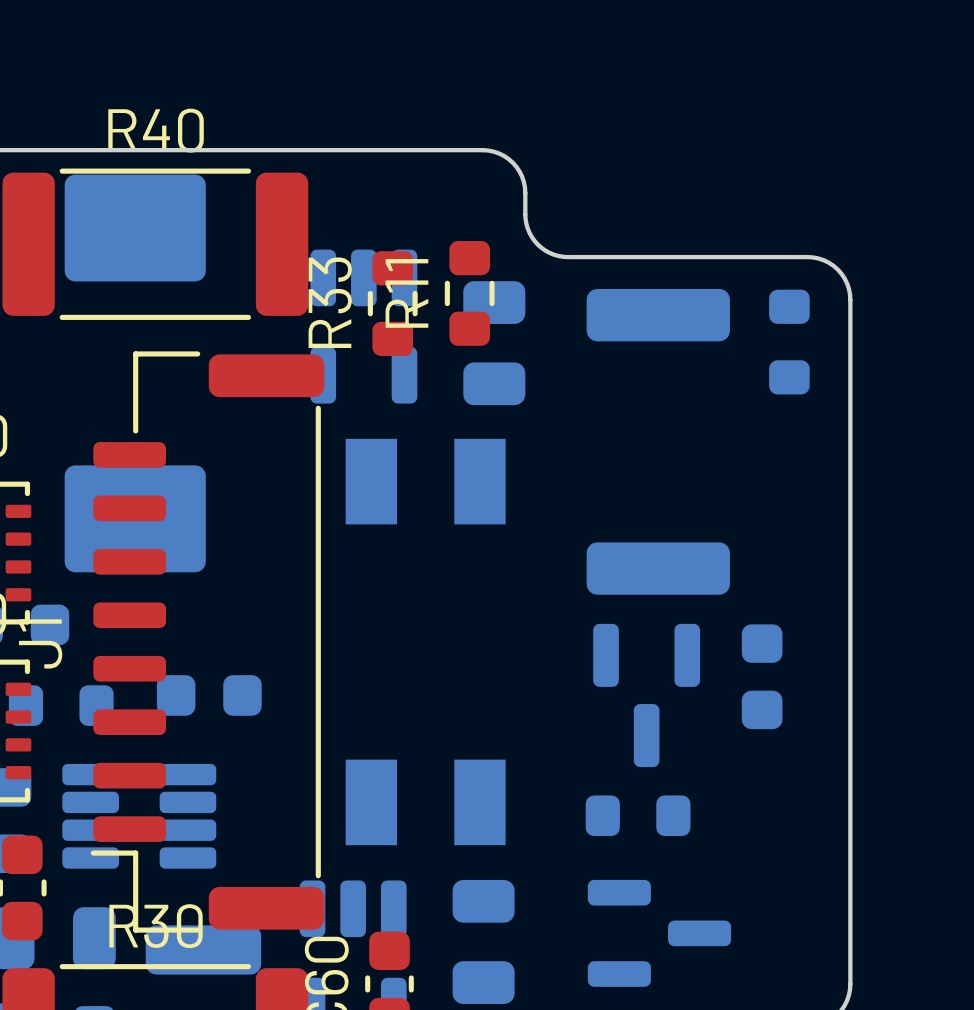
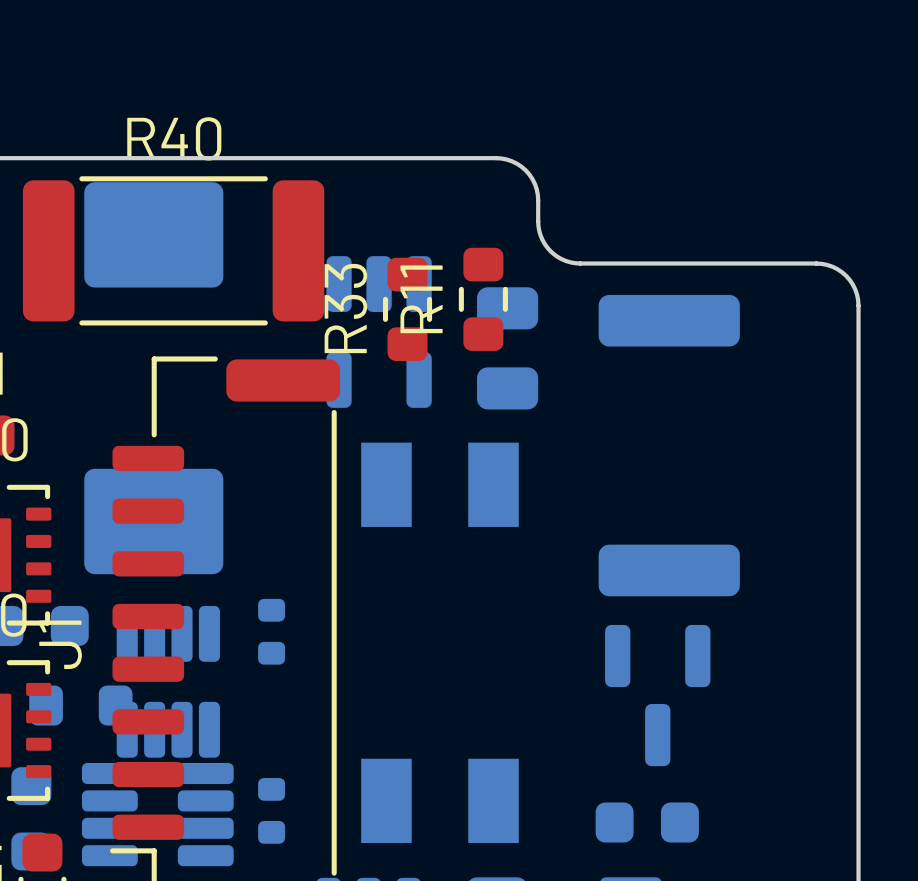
part: (789, 342) -> none
part: none -> (271, 631)
part: (762, 676) -> none
part: none -> (168, 681)
part: (209, 695) -> none
part footprint: [585, 795, 691, 837] -> [595, 802, 699, 843]
part: none -> (271, 810)

